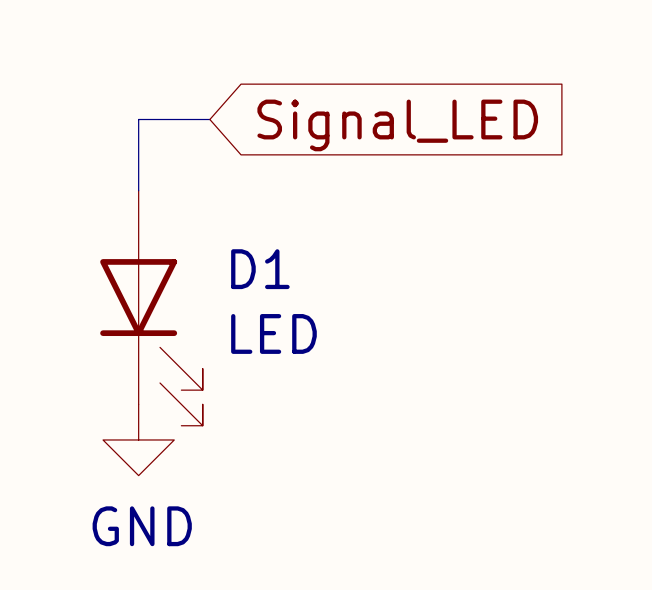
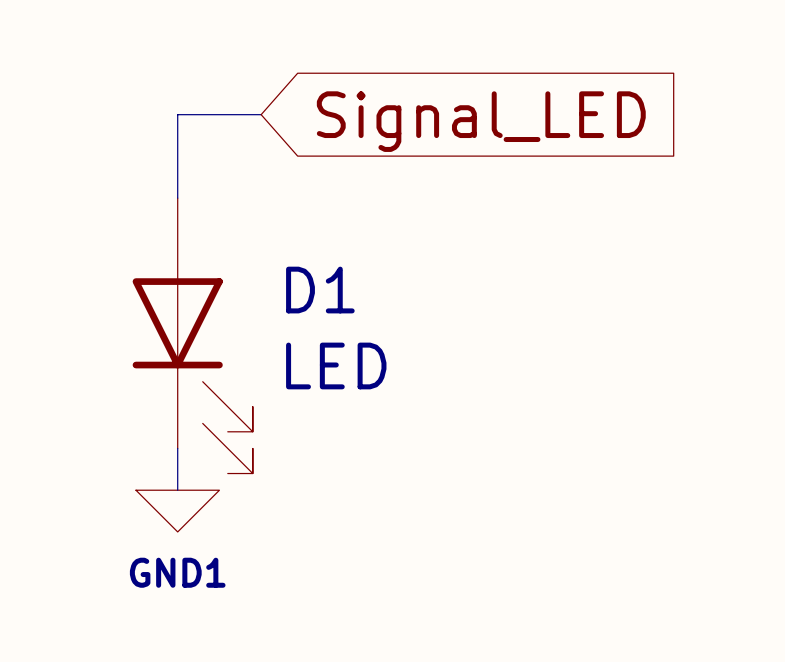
power symbol: GND (138, 439) -> GND1 (177, 511)

